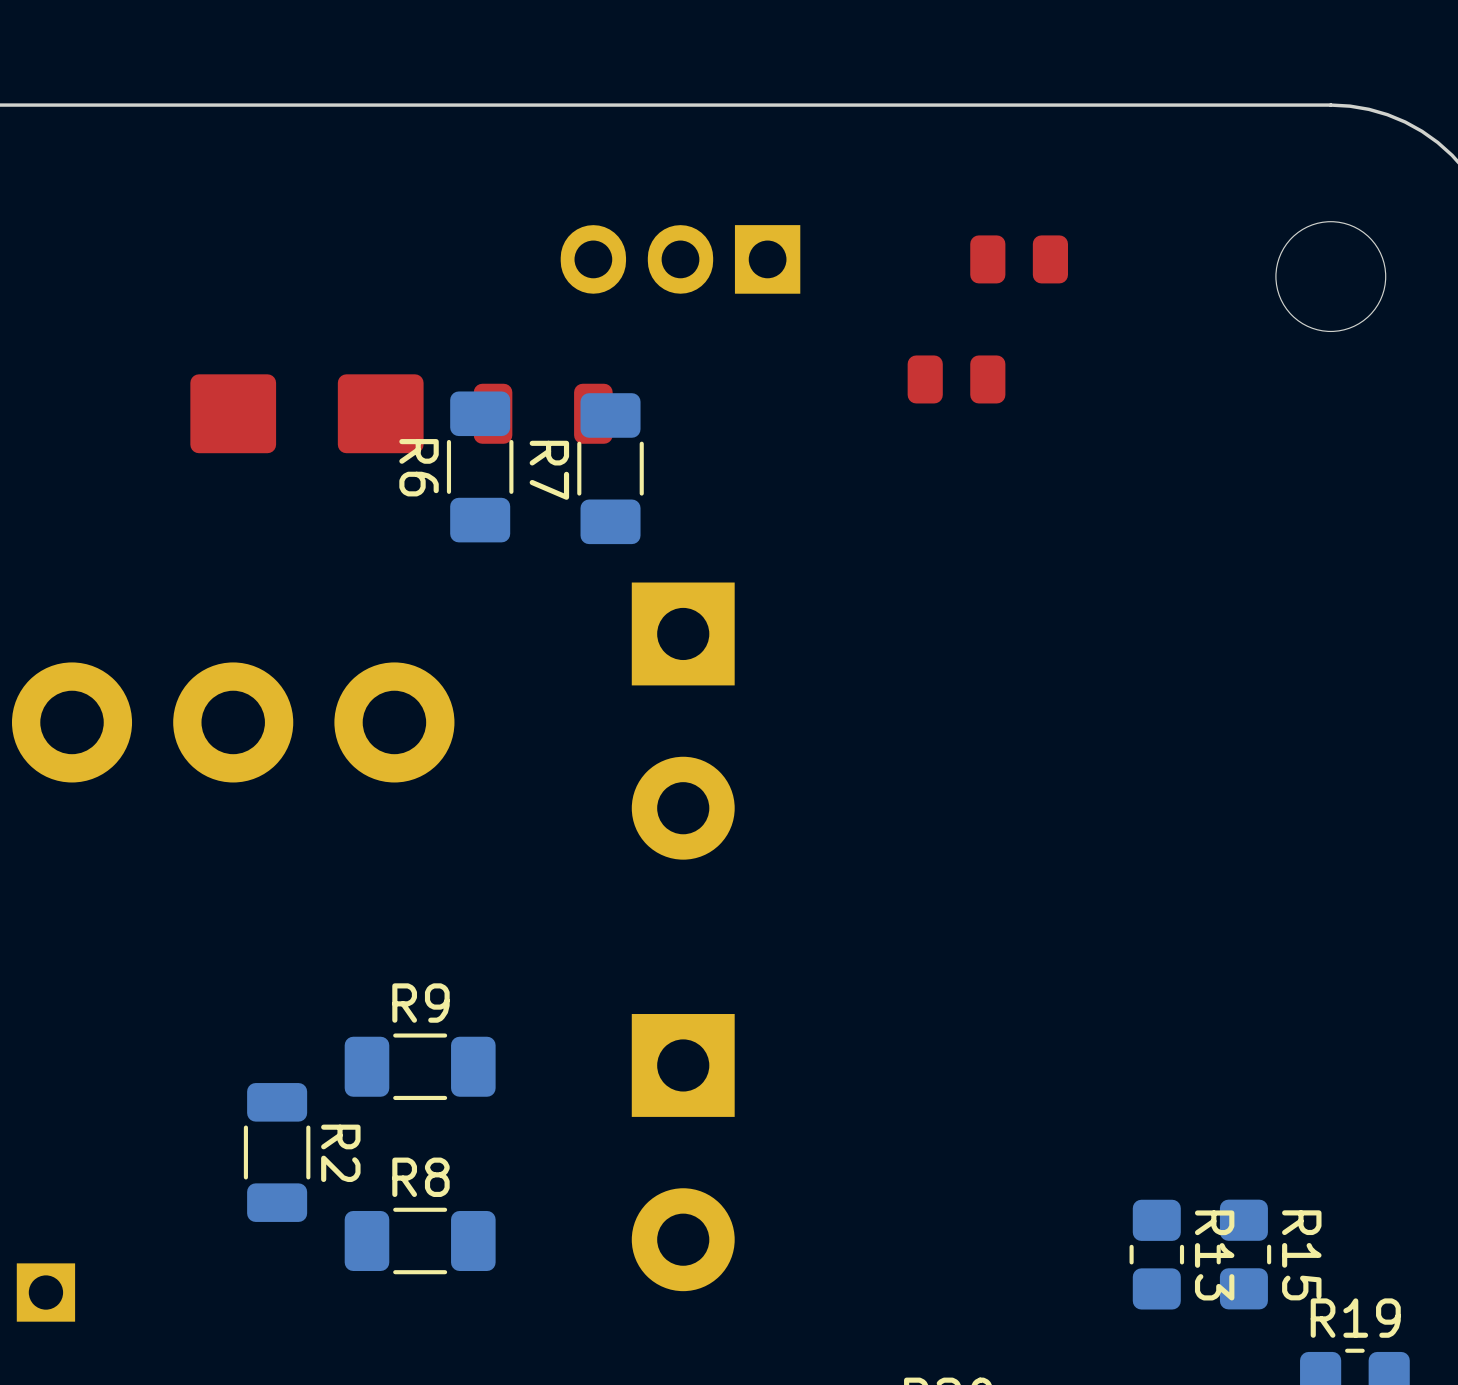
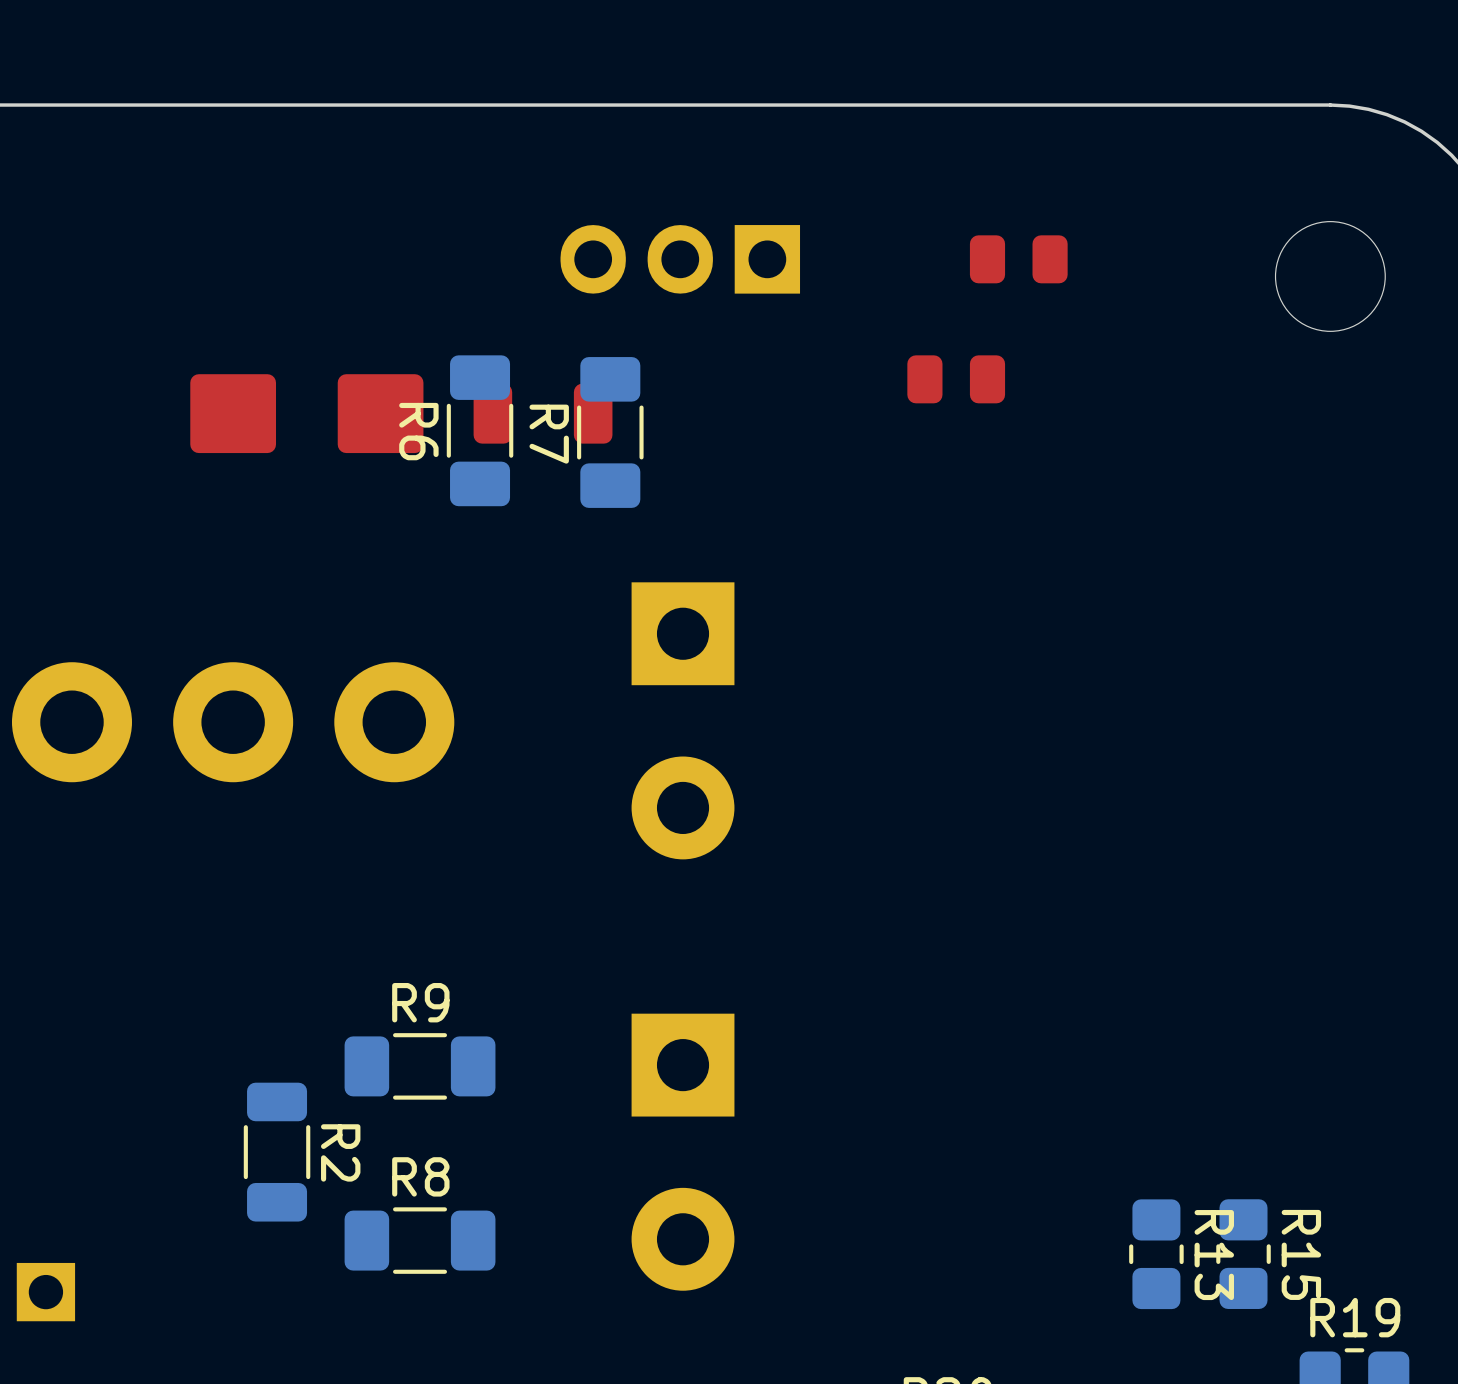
R6 position: (480, 466) -> (480, 430)
R7 position: (610, 468) -> (610, 432)

